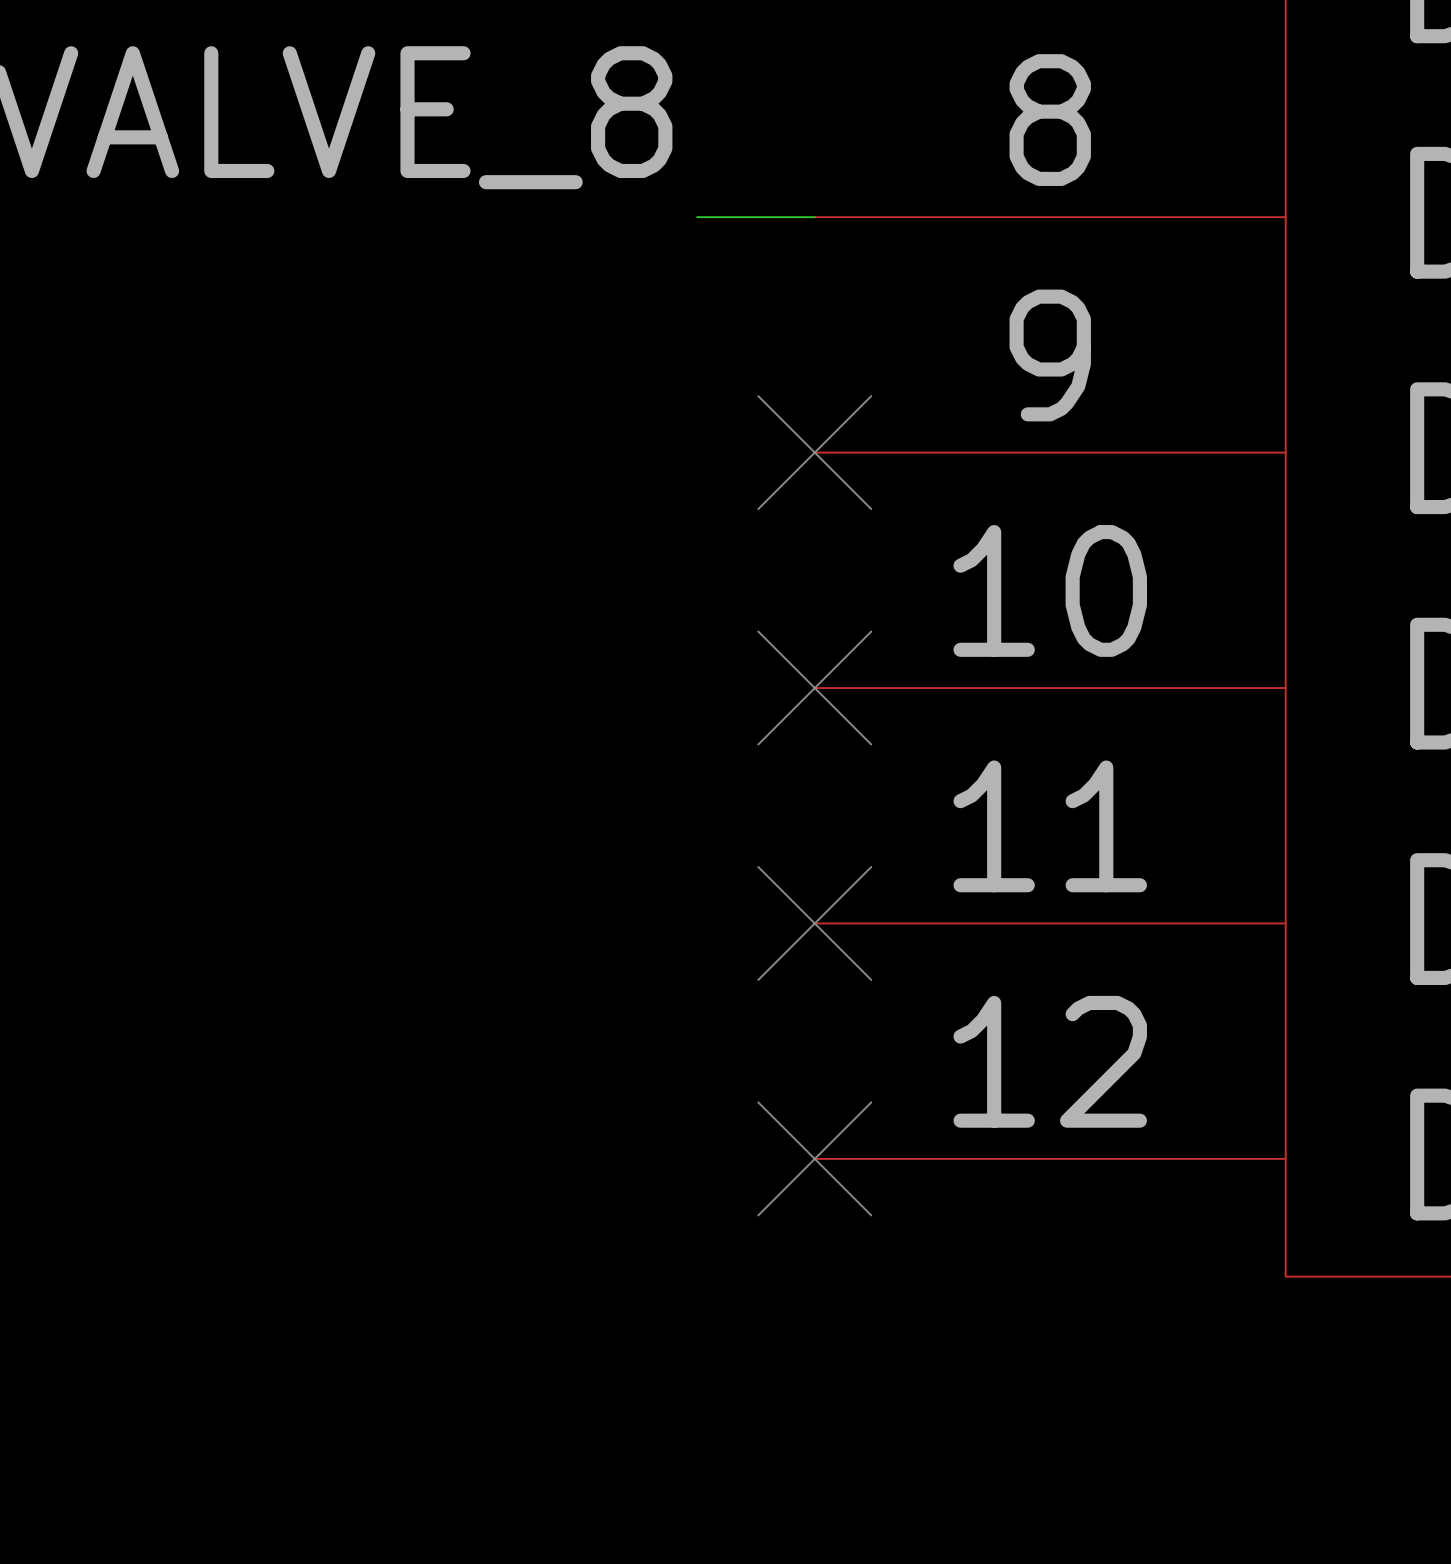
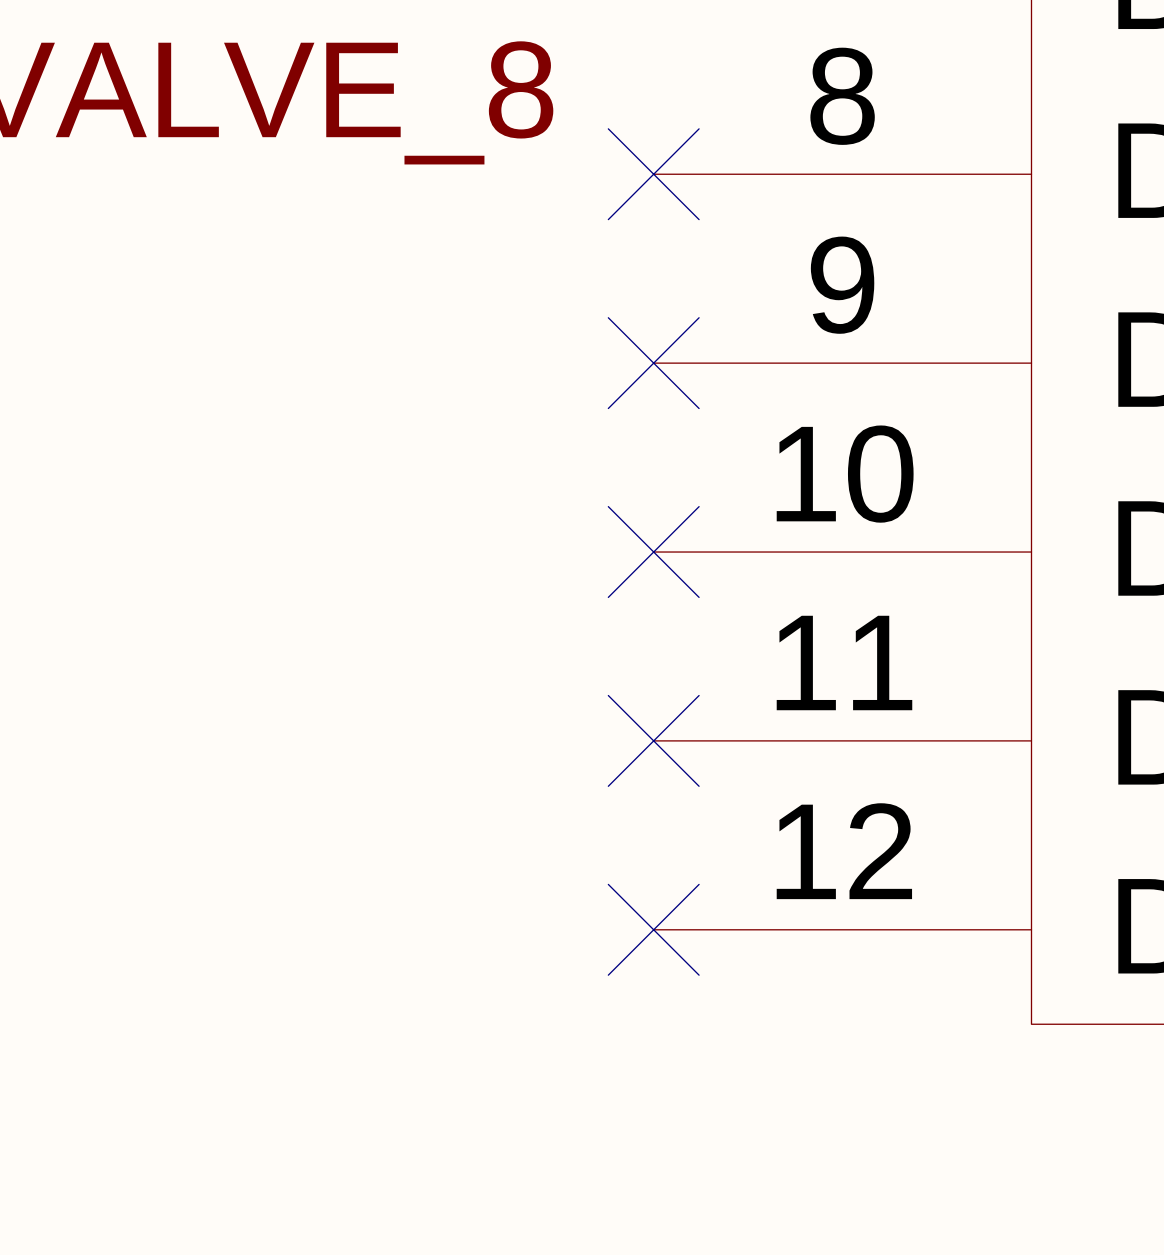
wire: (697, 217) (814, 217) -> none
no-connect mark: none -> (653, 174)

